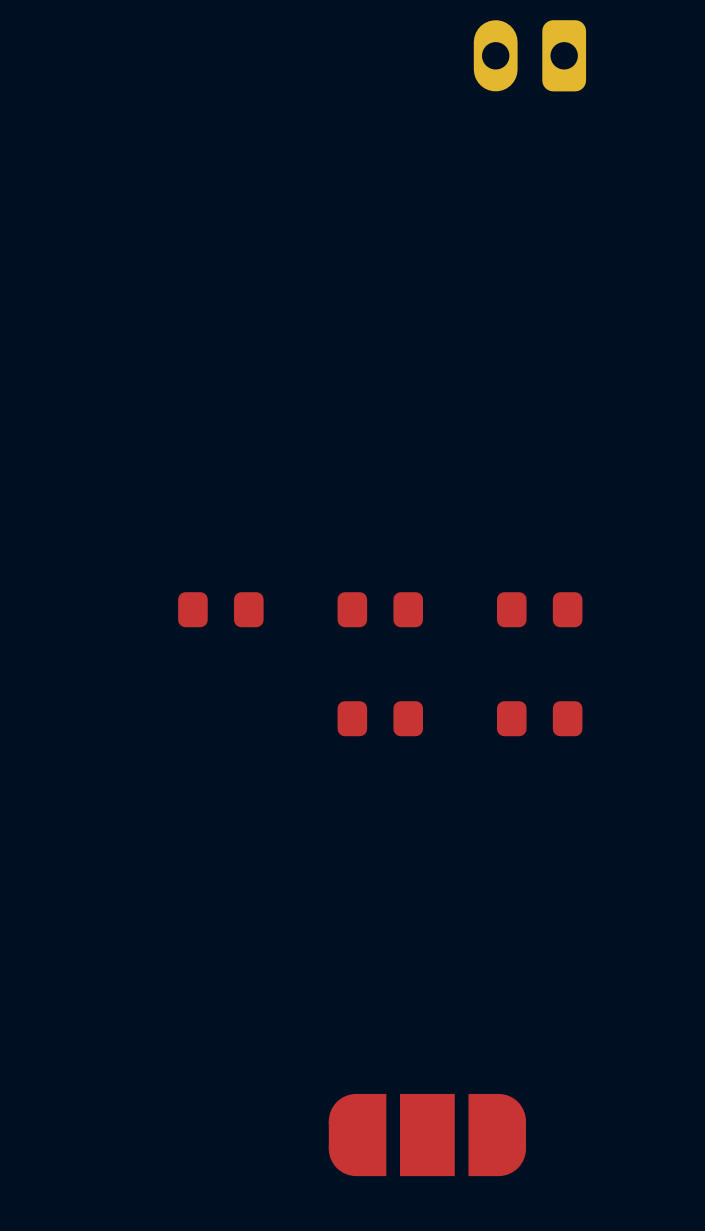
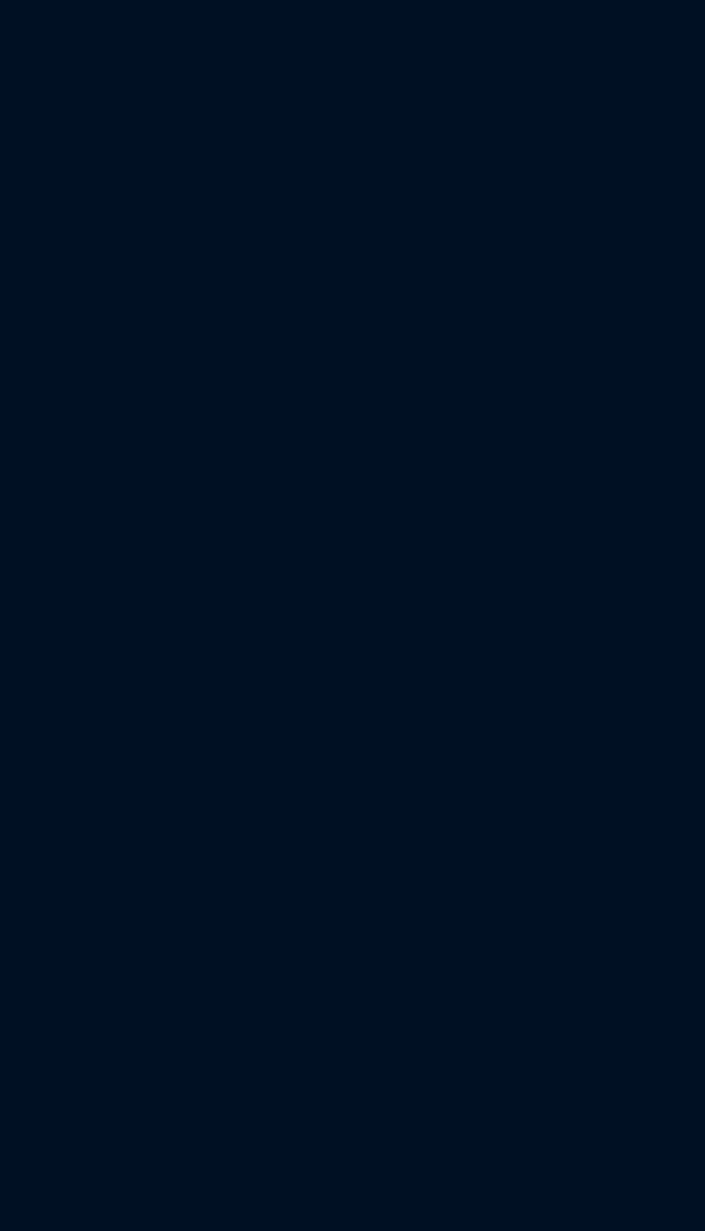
part: (529, 55) -> none
part: (220, 609) -> none
part: (380, 609) -> none
part: (539, 609) -> none
part: (380, 718) -> none
part: (539, 718) -> none
part: (427, 1135) -> none

